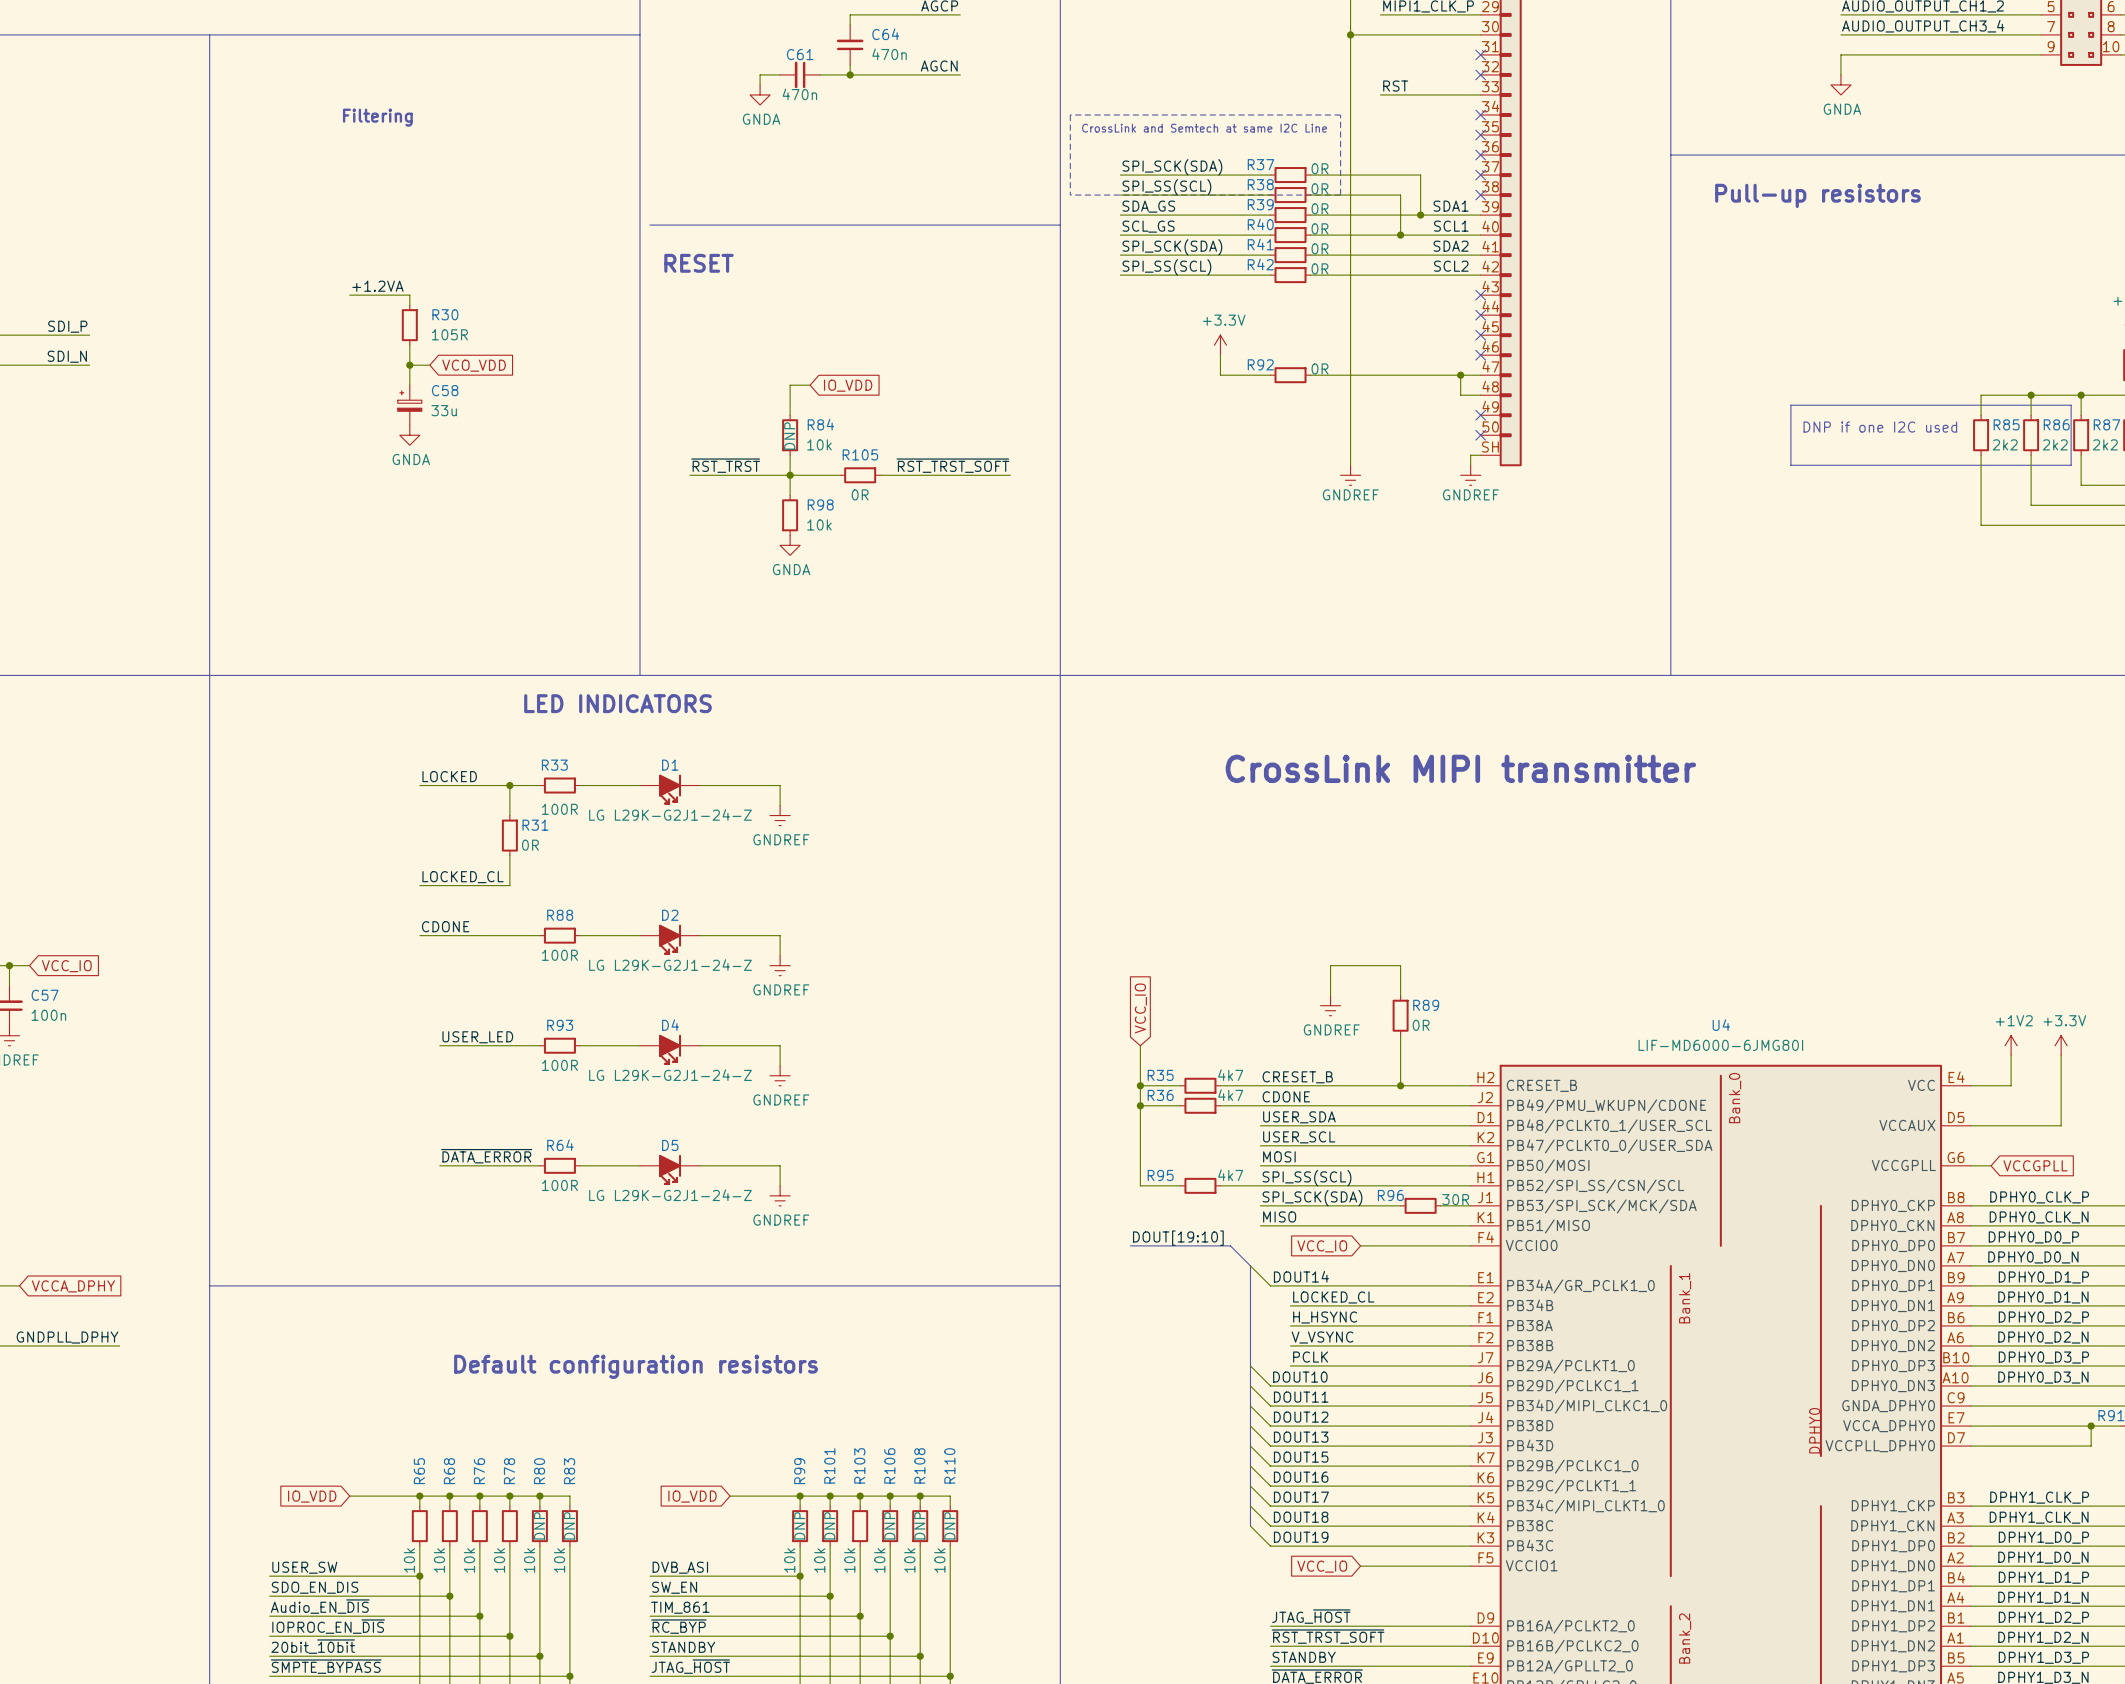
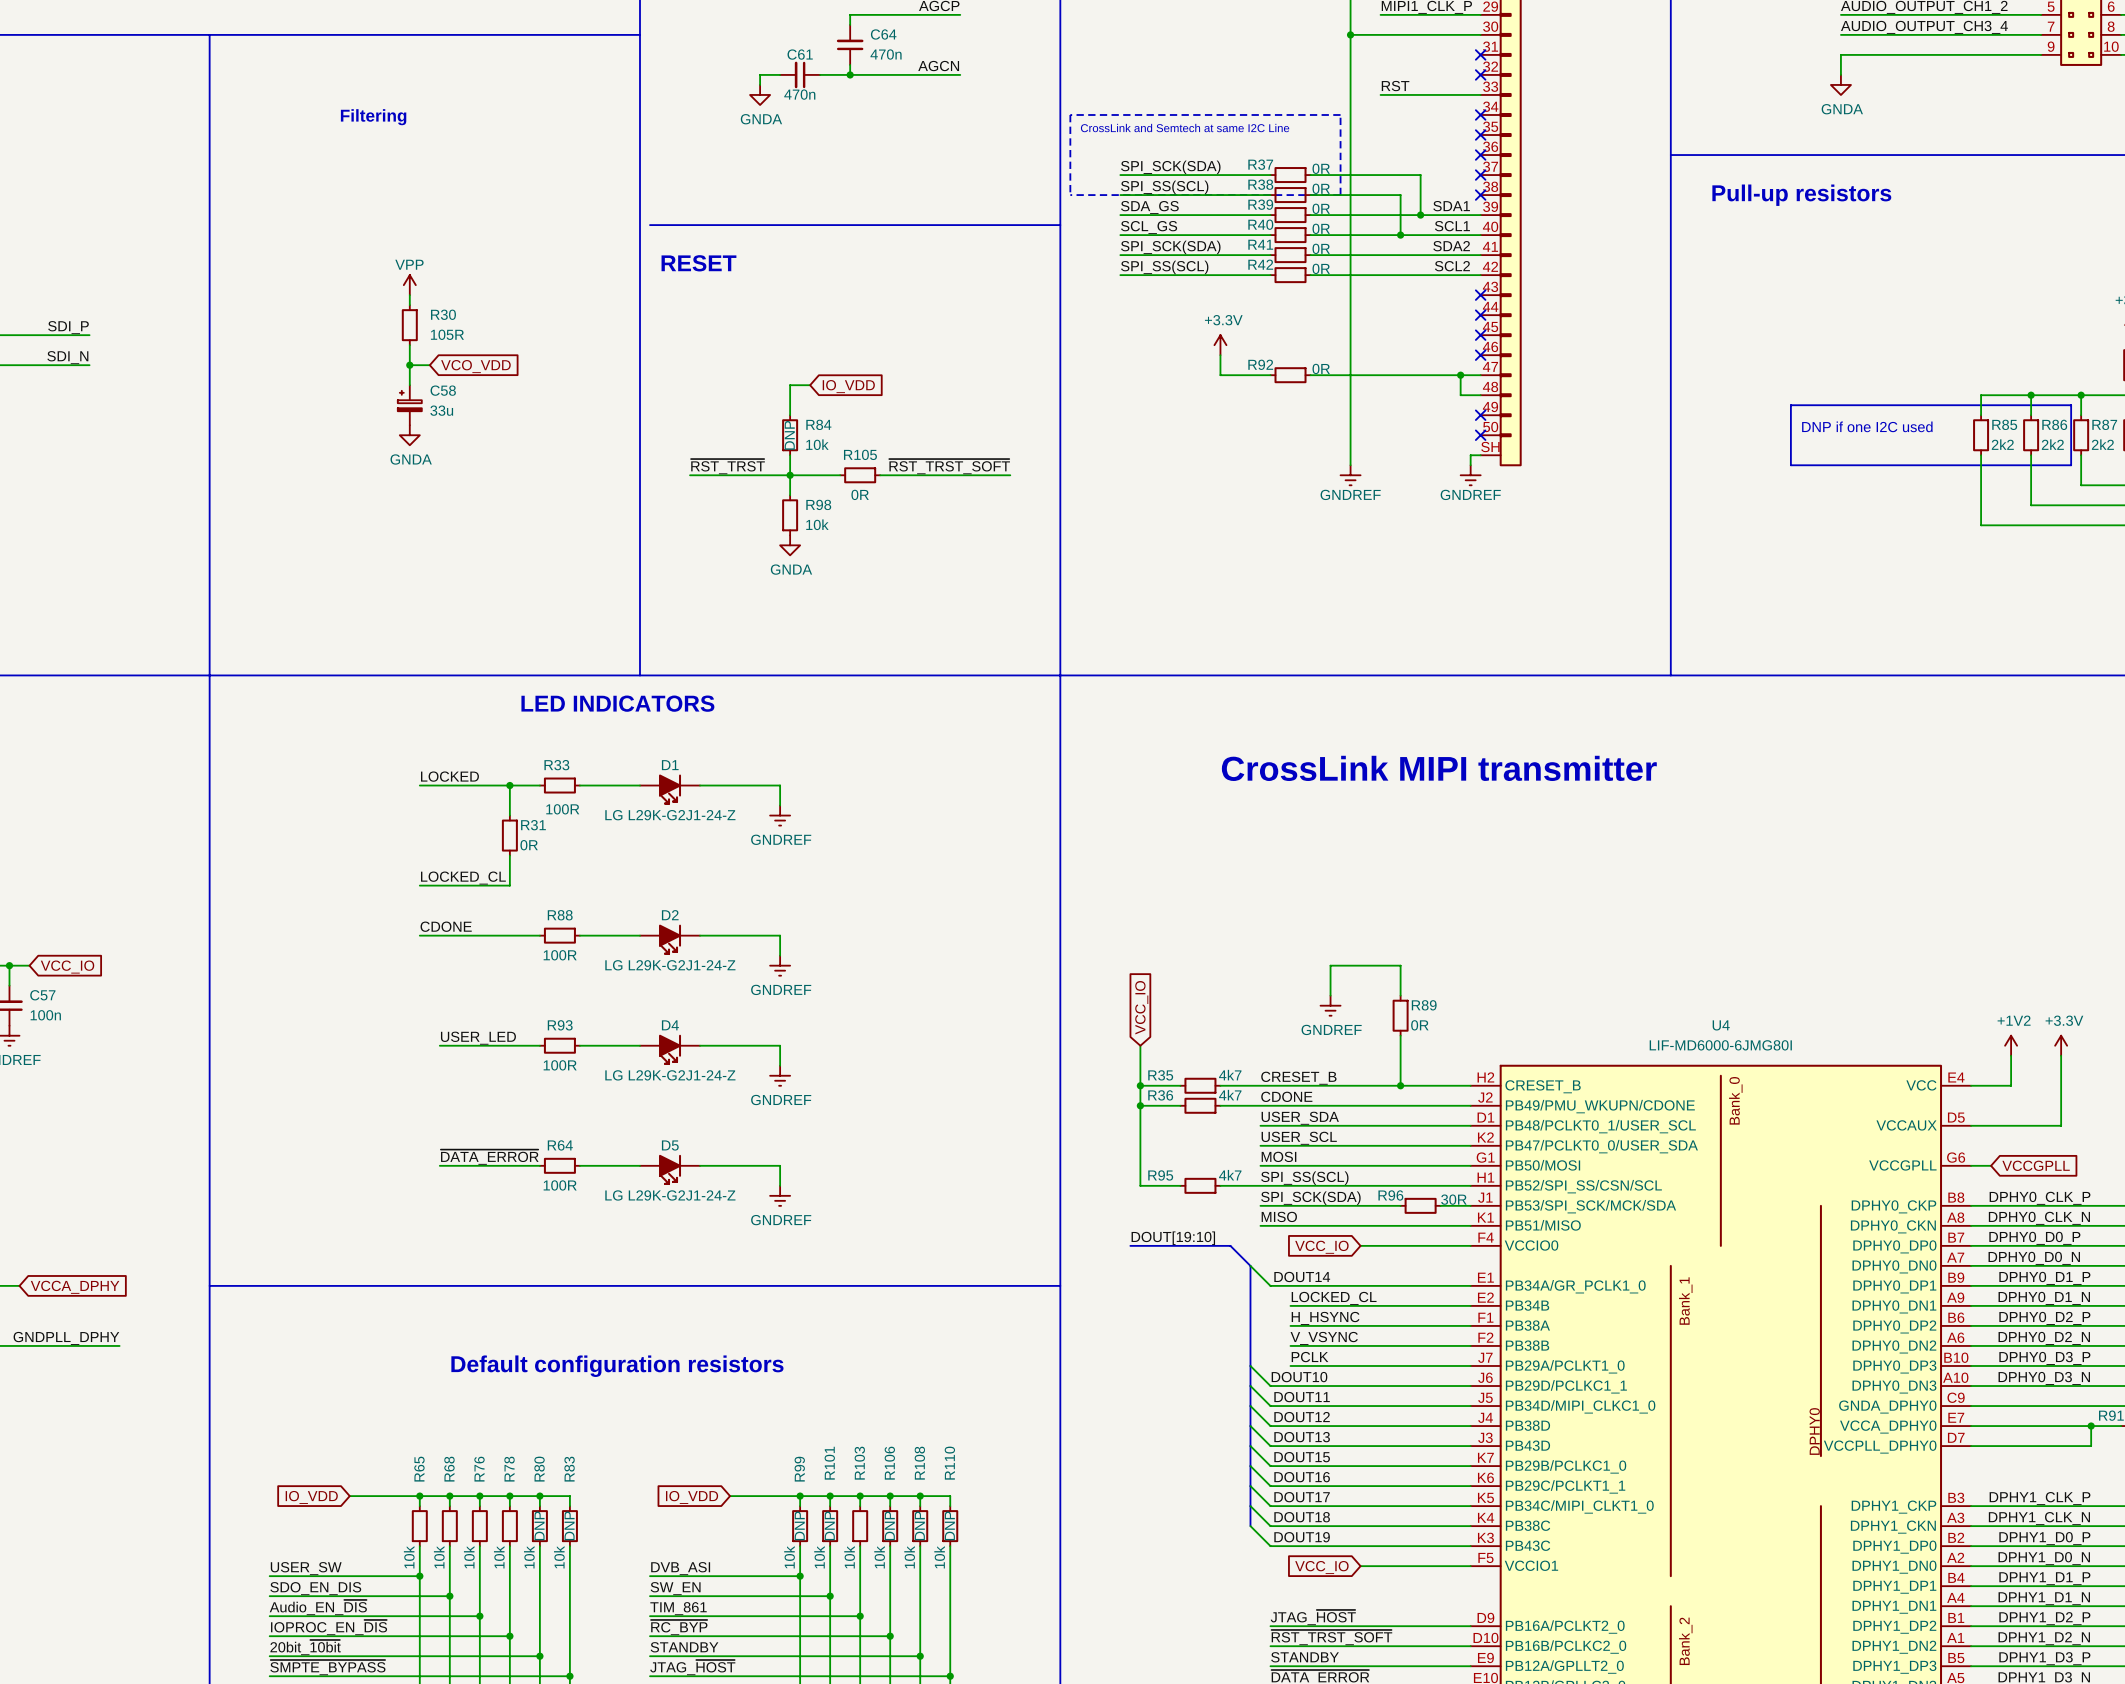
power symbol: none -> VPP (409, 285)
label: +1.2VA (377, 286) -> none
wire: (349, 295) (409, 295) -> none

